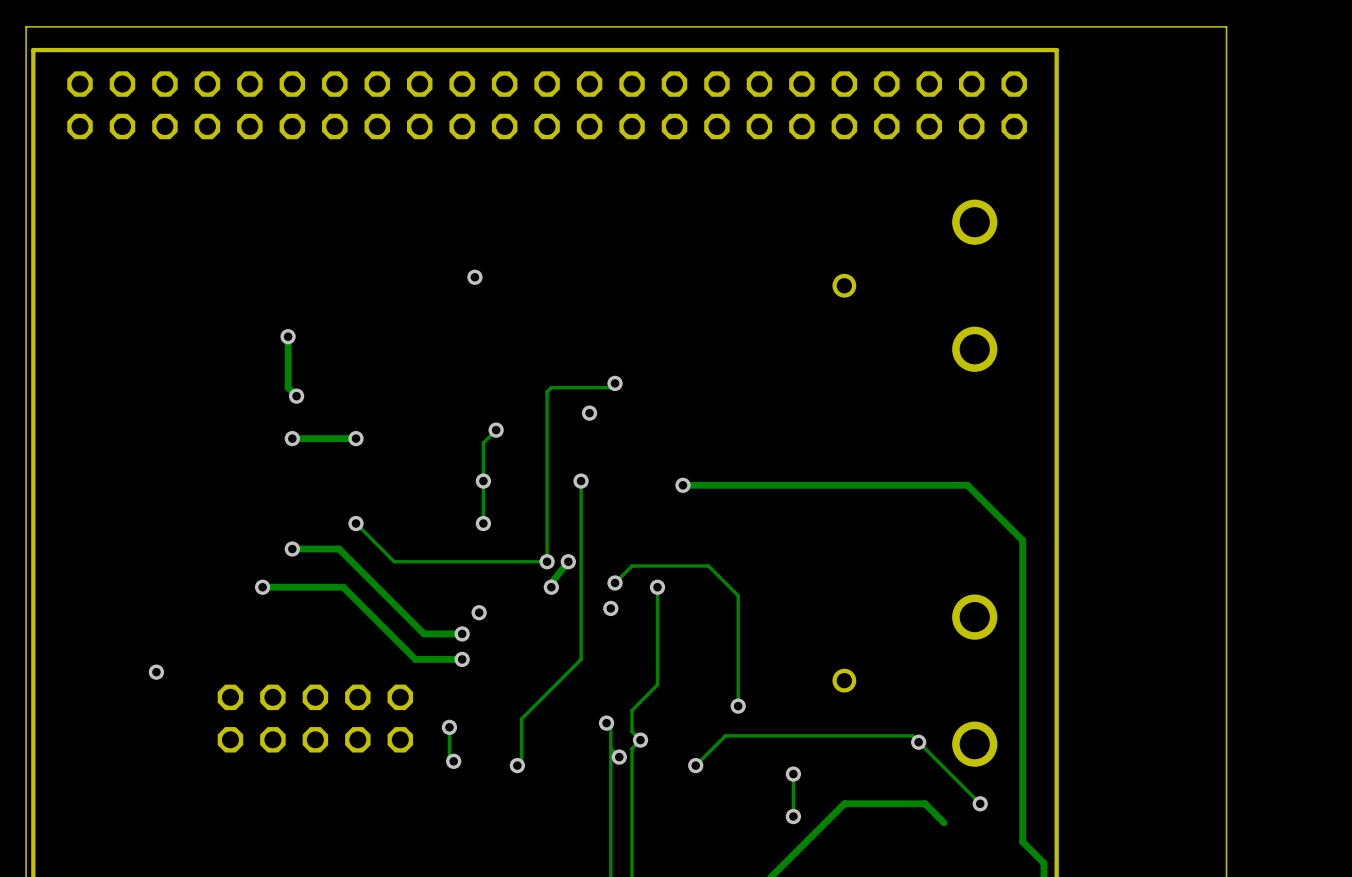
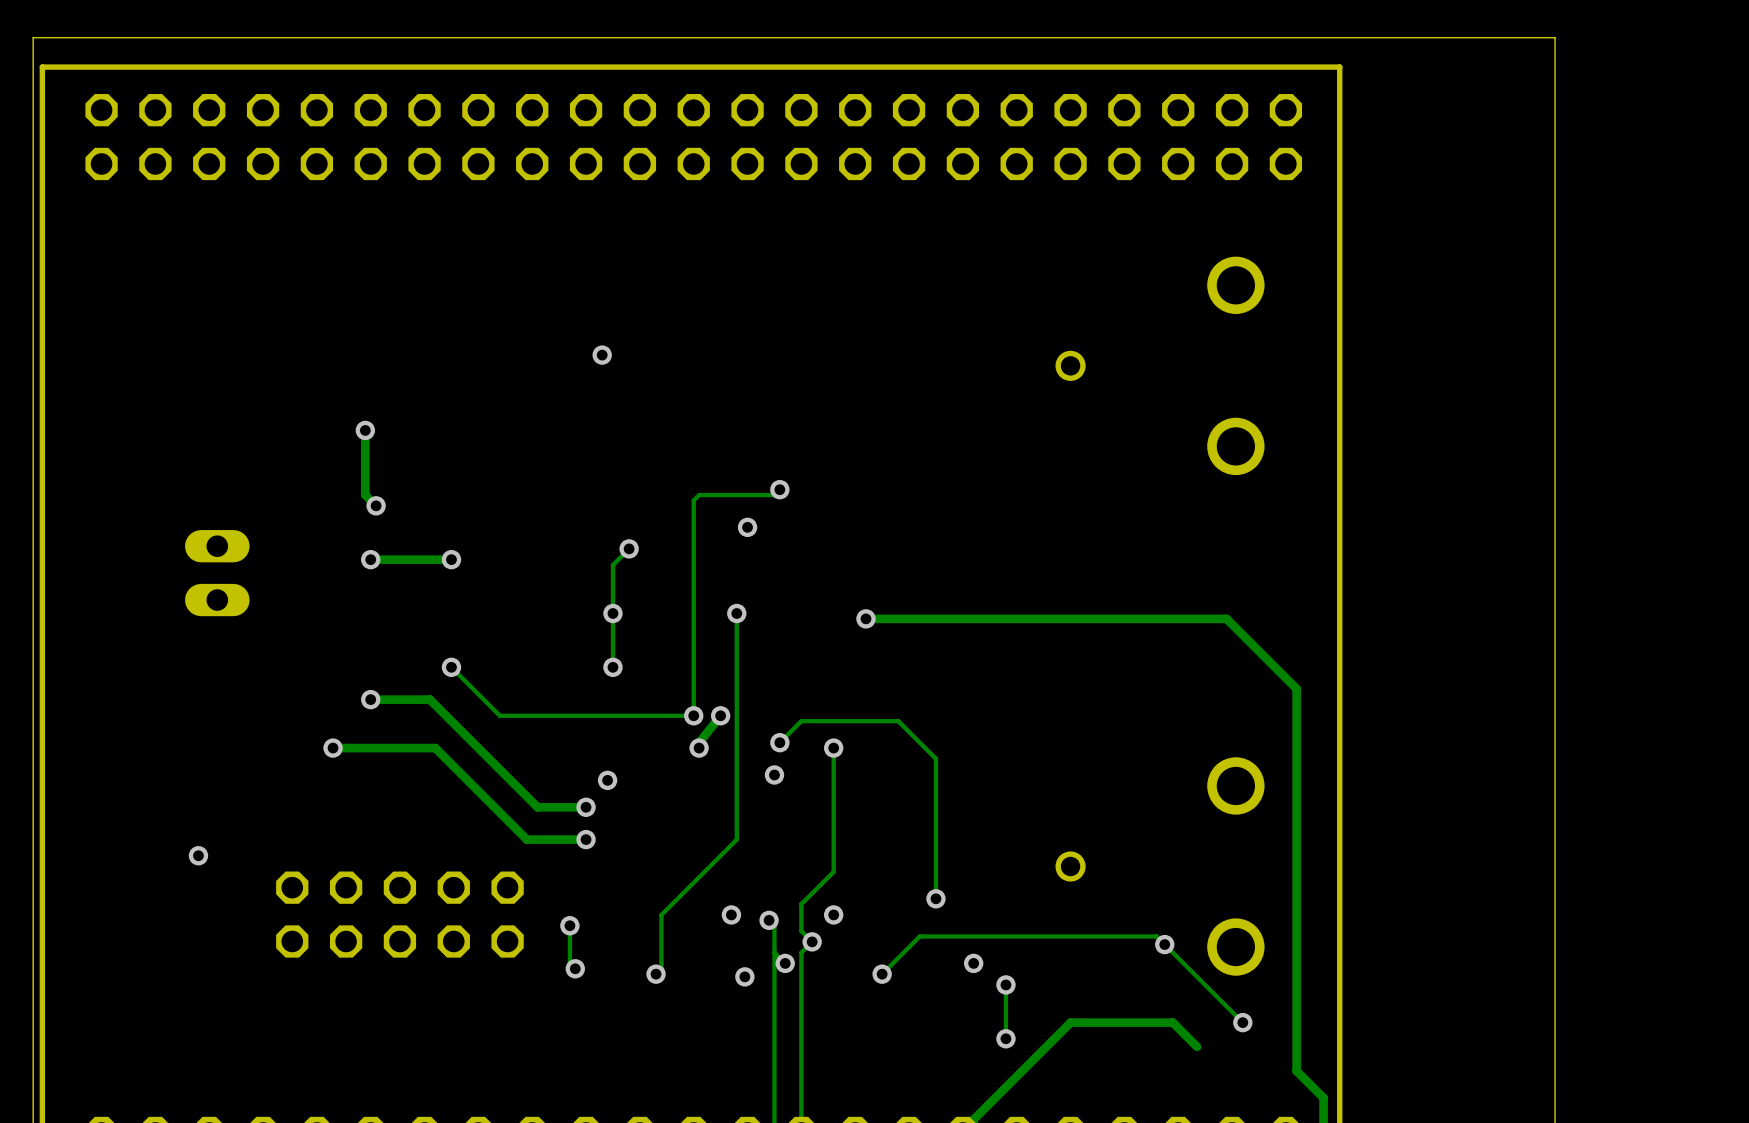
part: none -> (217, 573)
via: none -> (731, 914)
via: none -> (833, 914)
via: none -> (973, 963)
via: none -> (744, 976)

